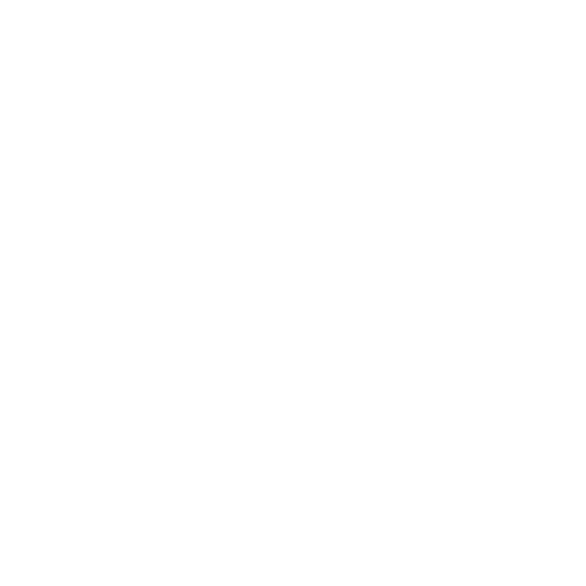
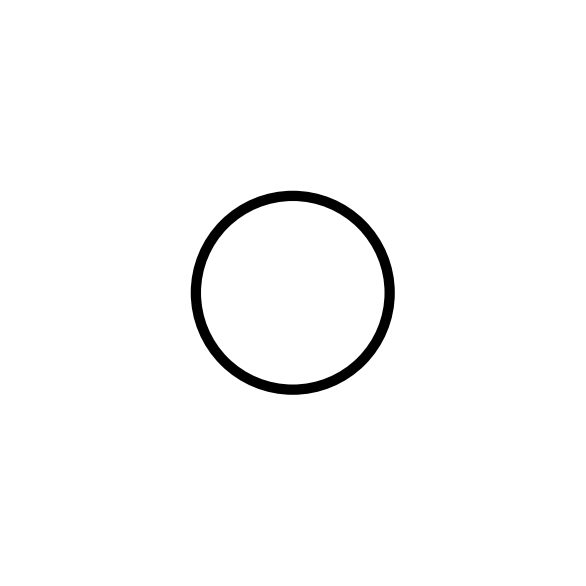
round board edge: none -> [190, 190, 395, 395]

